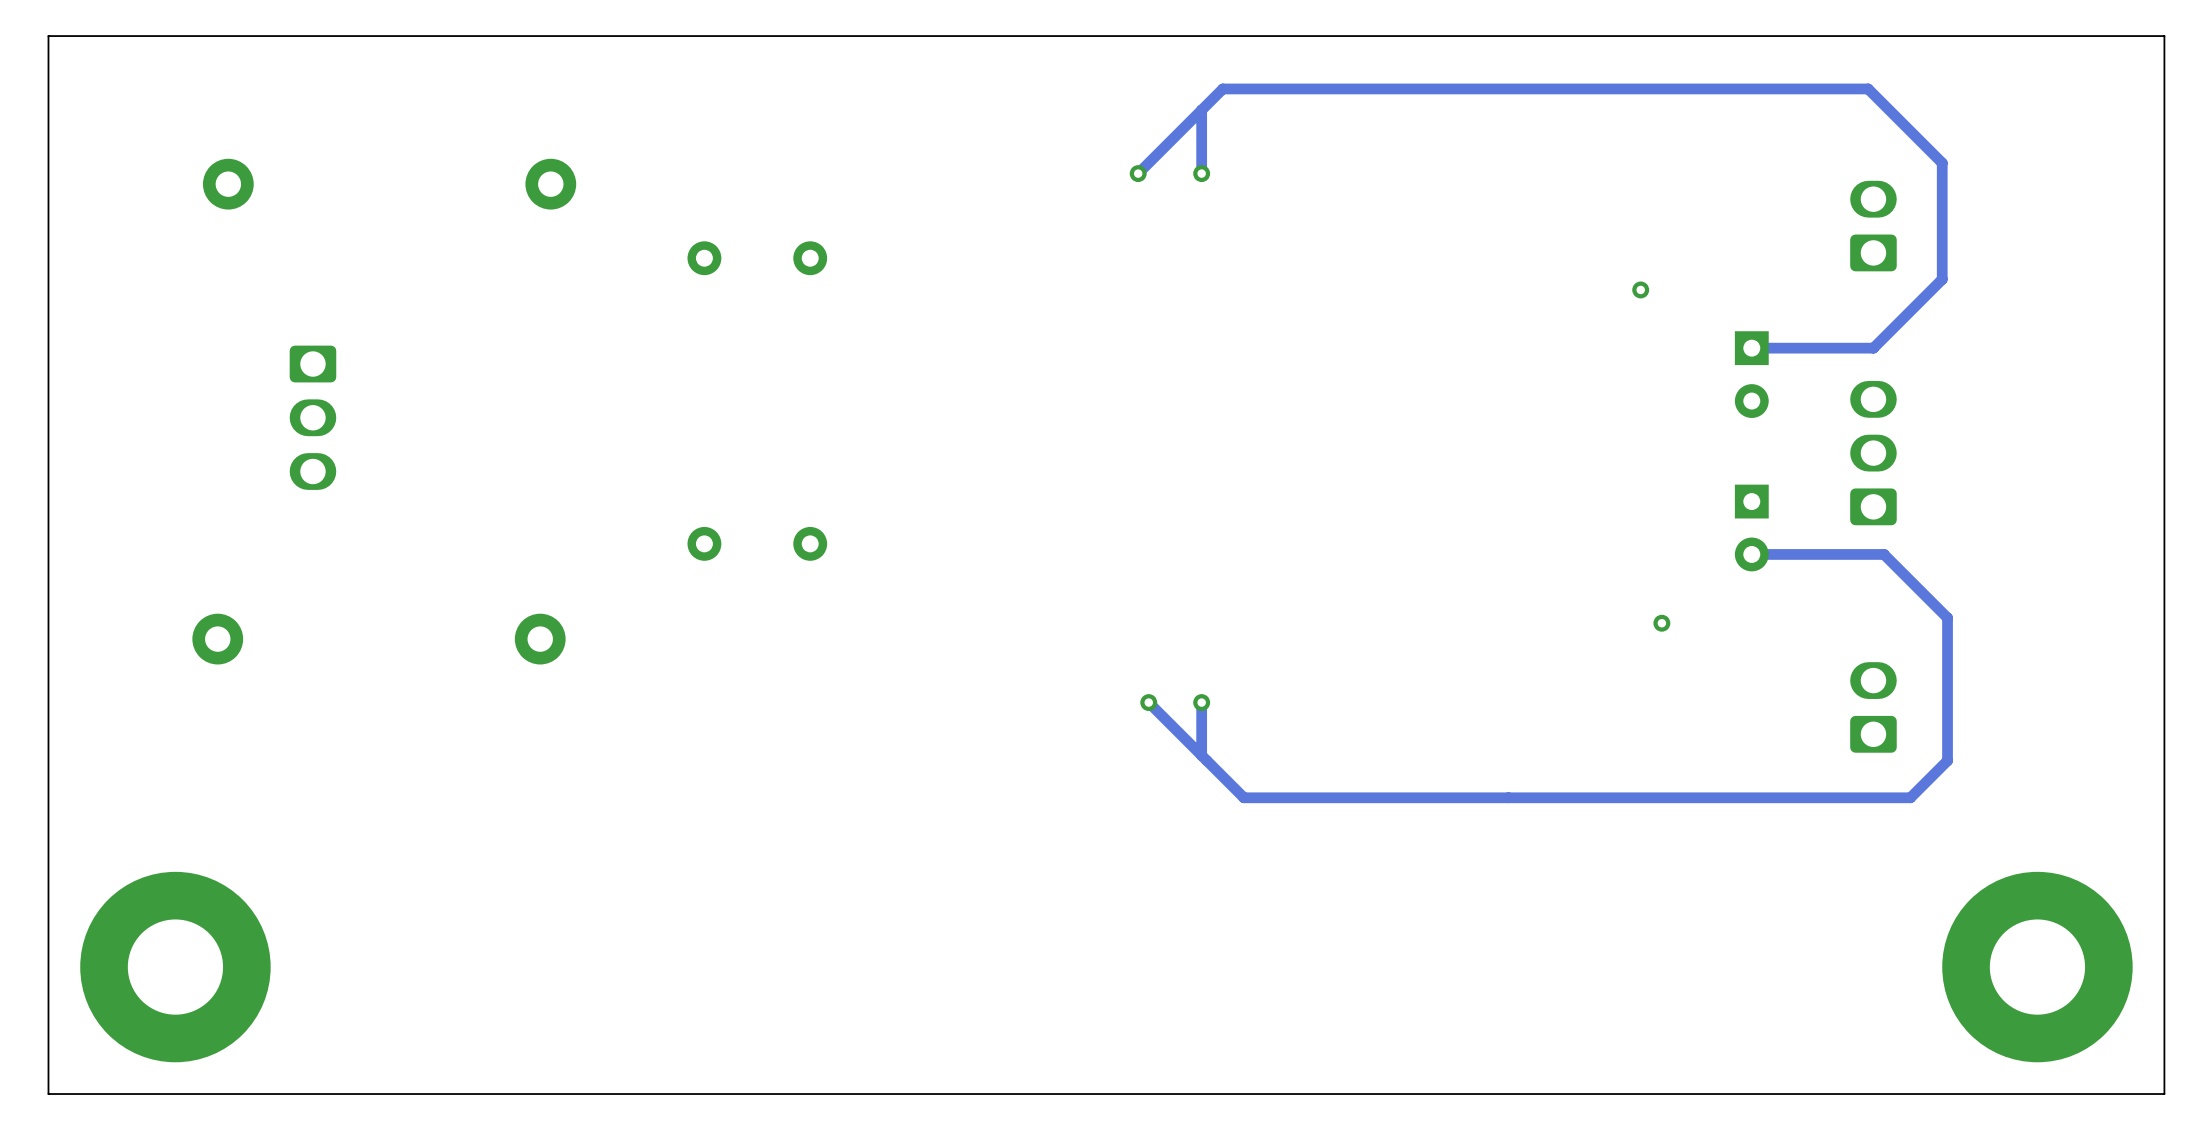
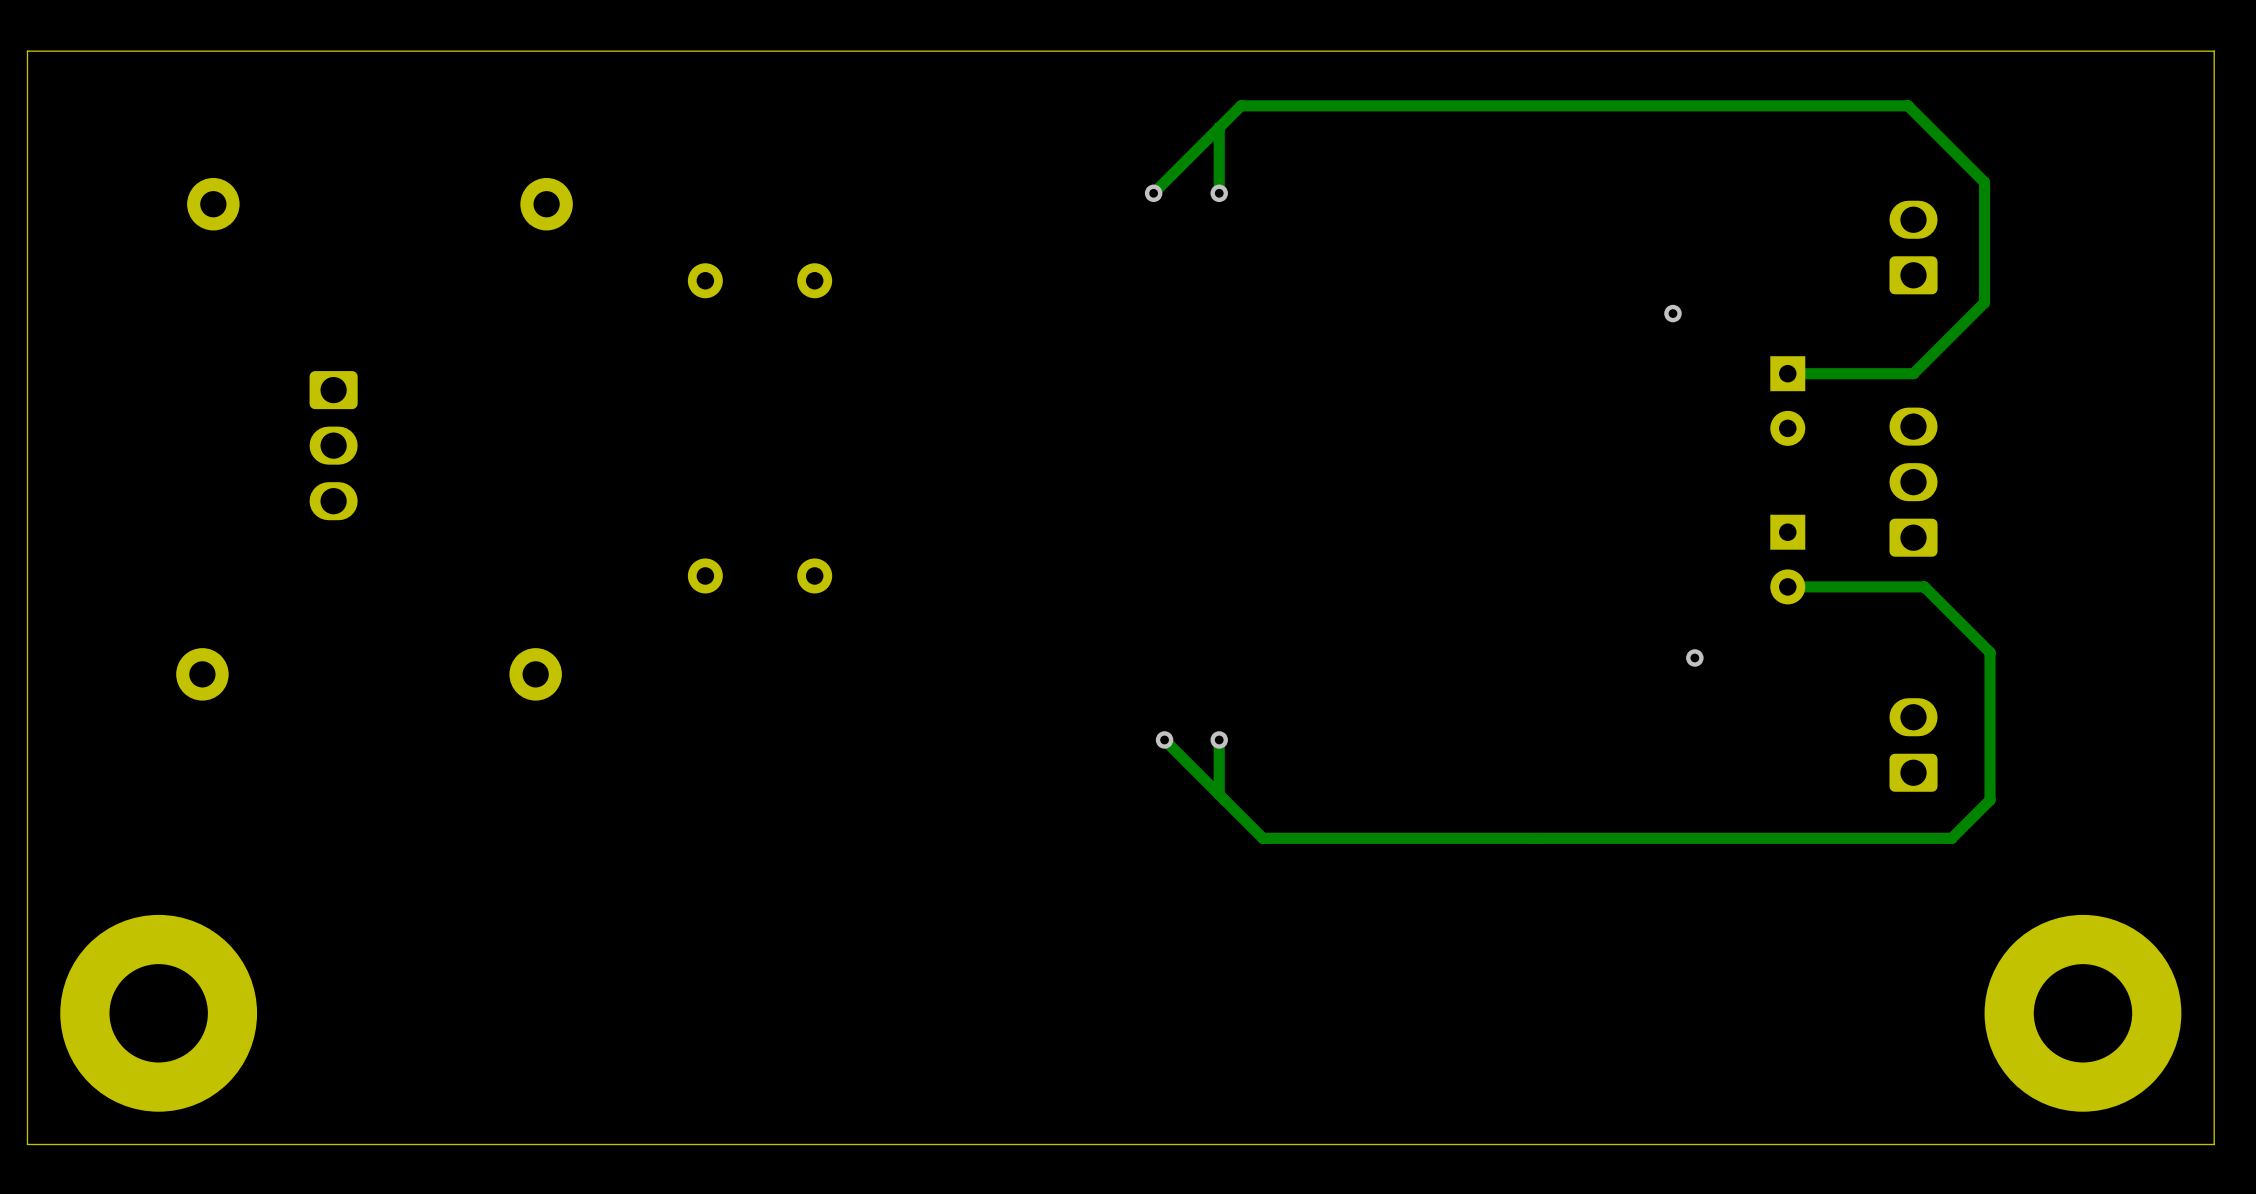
part position: (312, 417) -> (333, 445)

